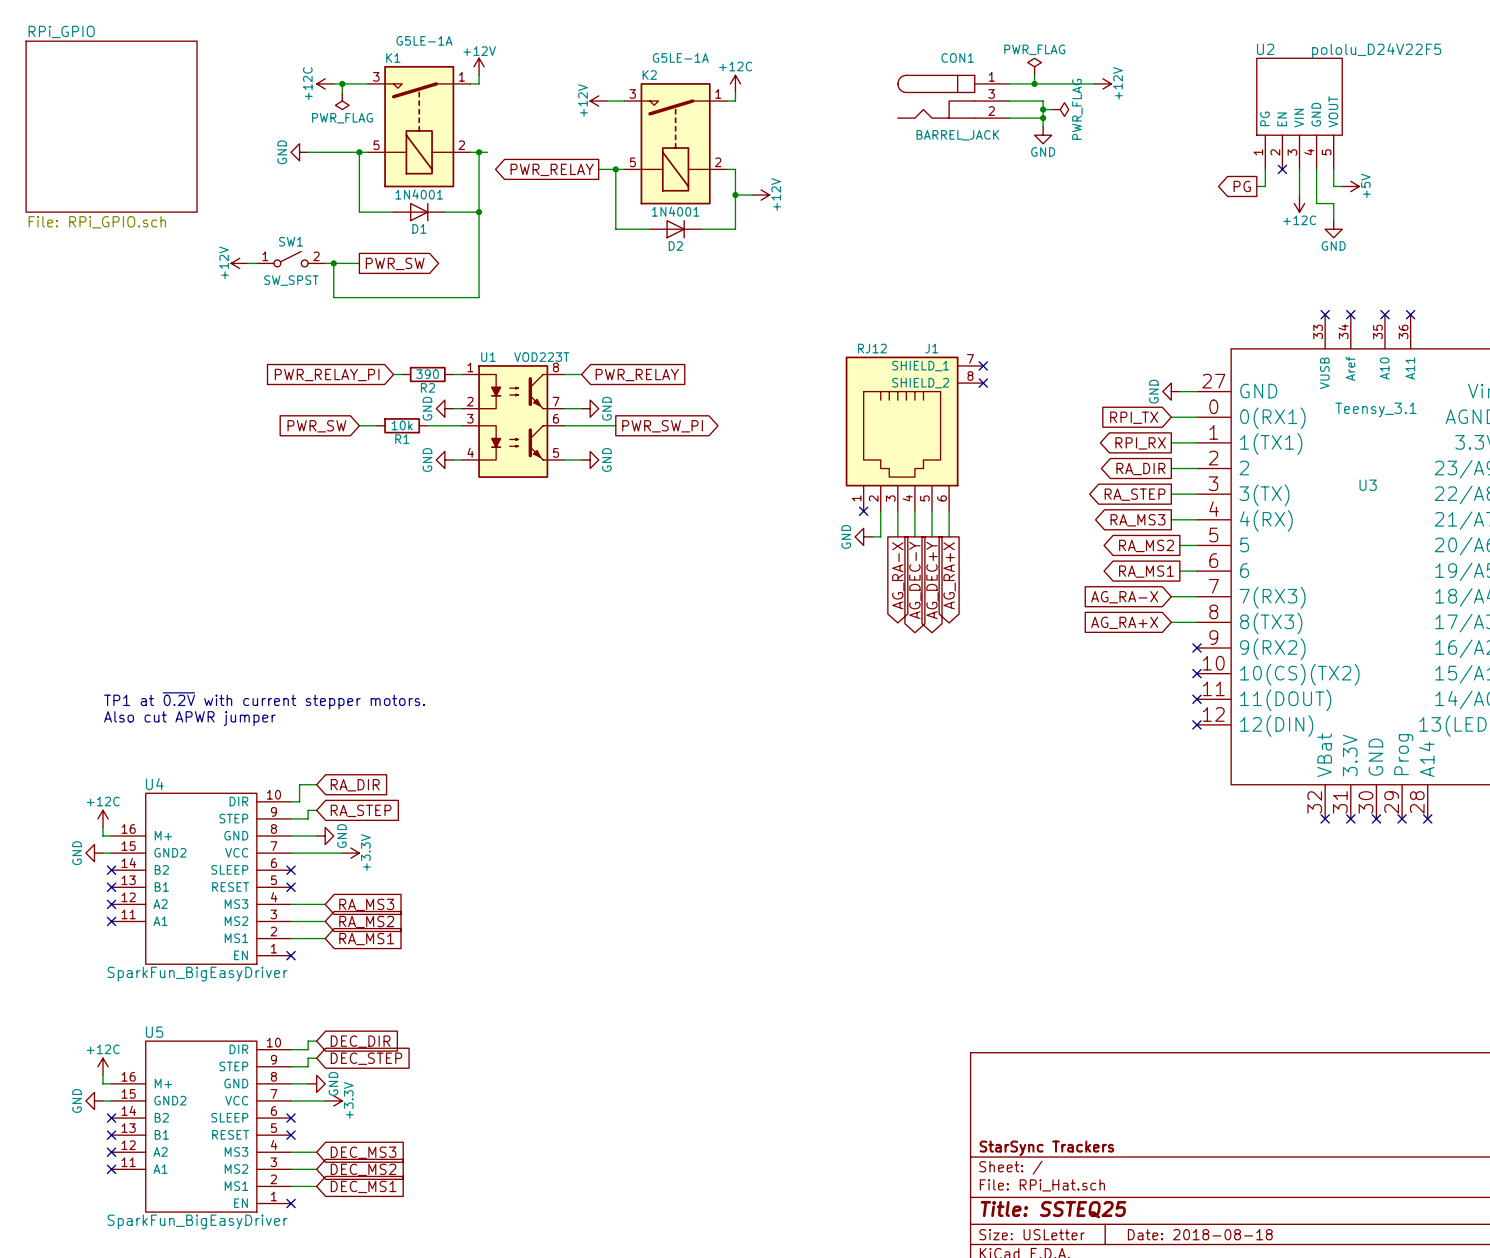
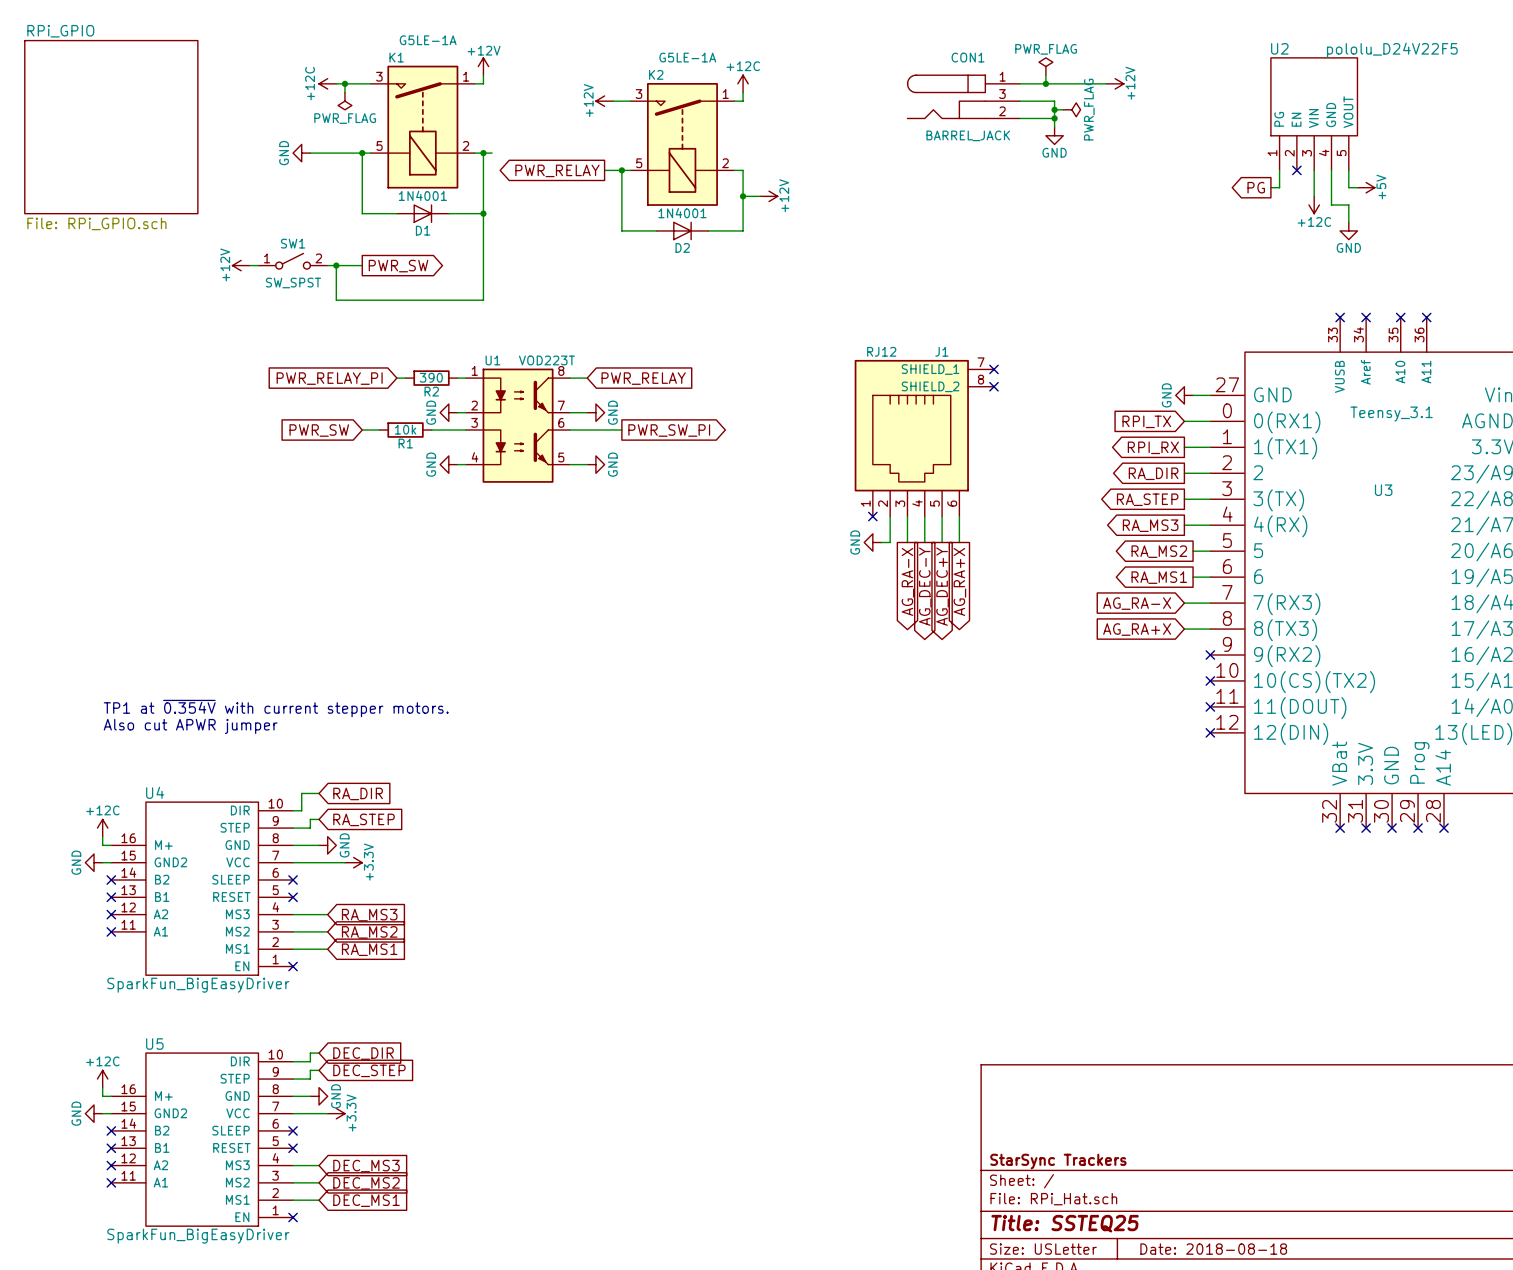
text: TP1 at ~{0.2V} with current stepper motors. (264, 700) -> TP1 at ~{0.354V} with current stepper motors. (276, 708)

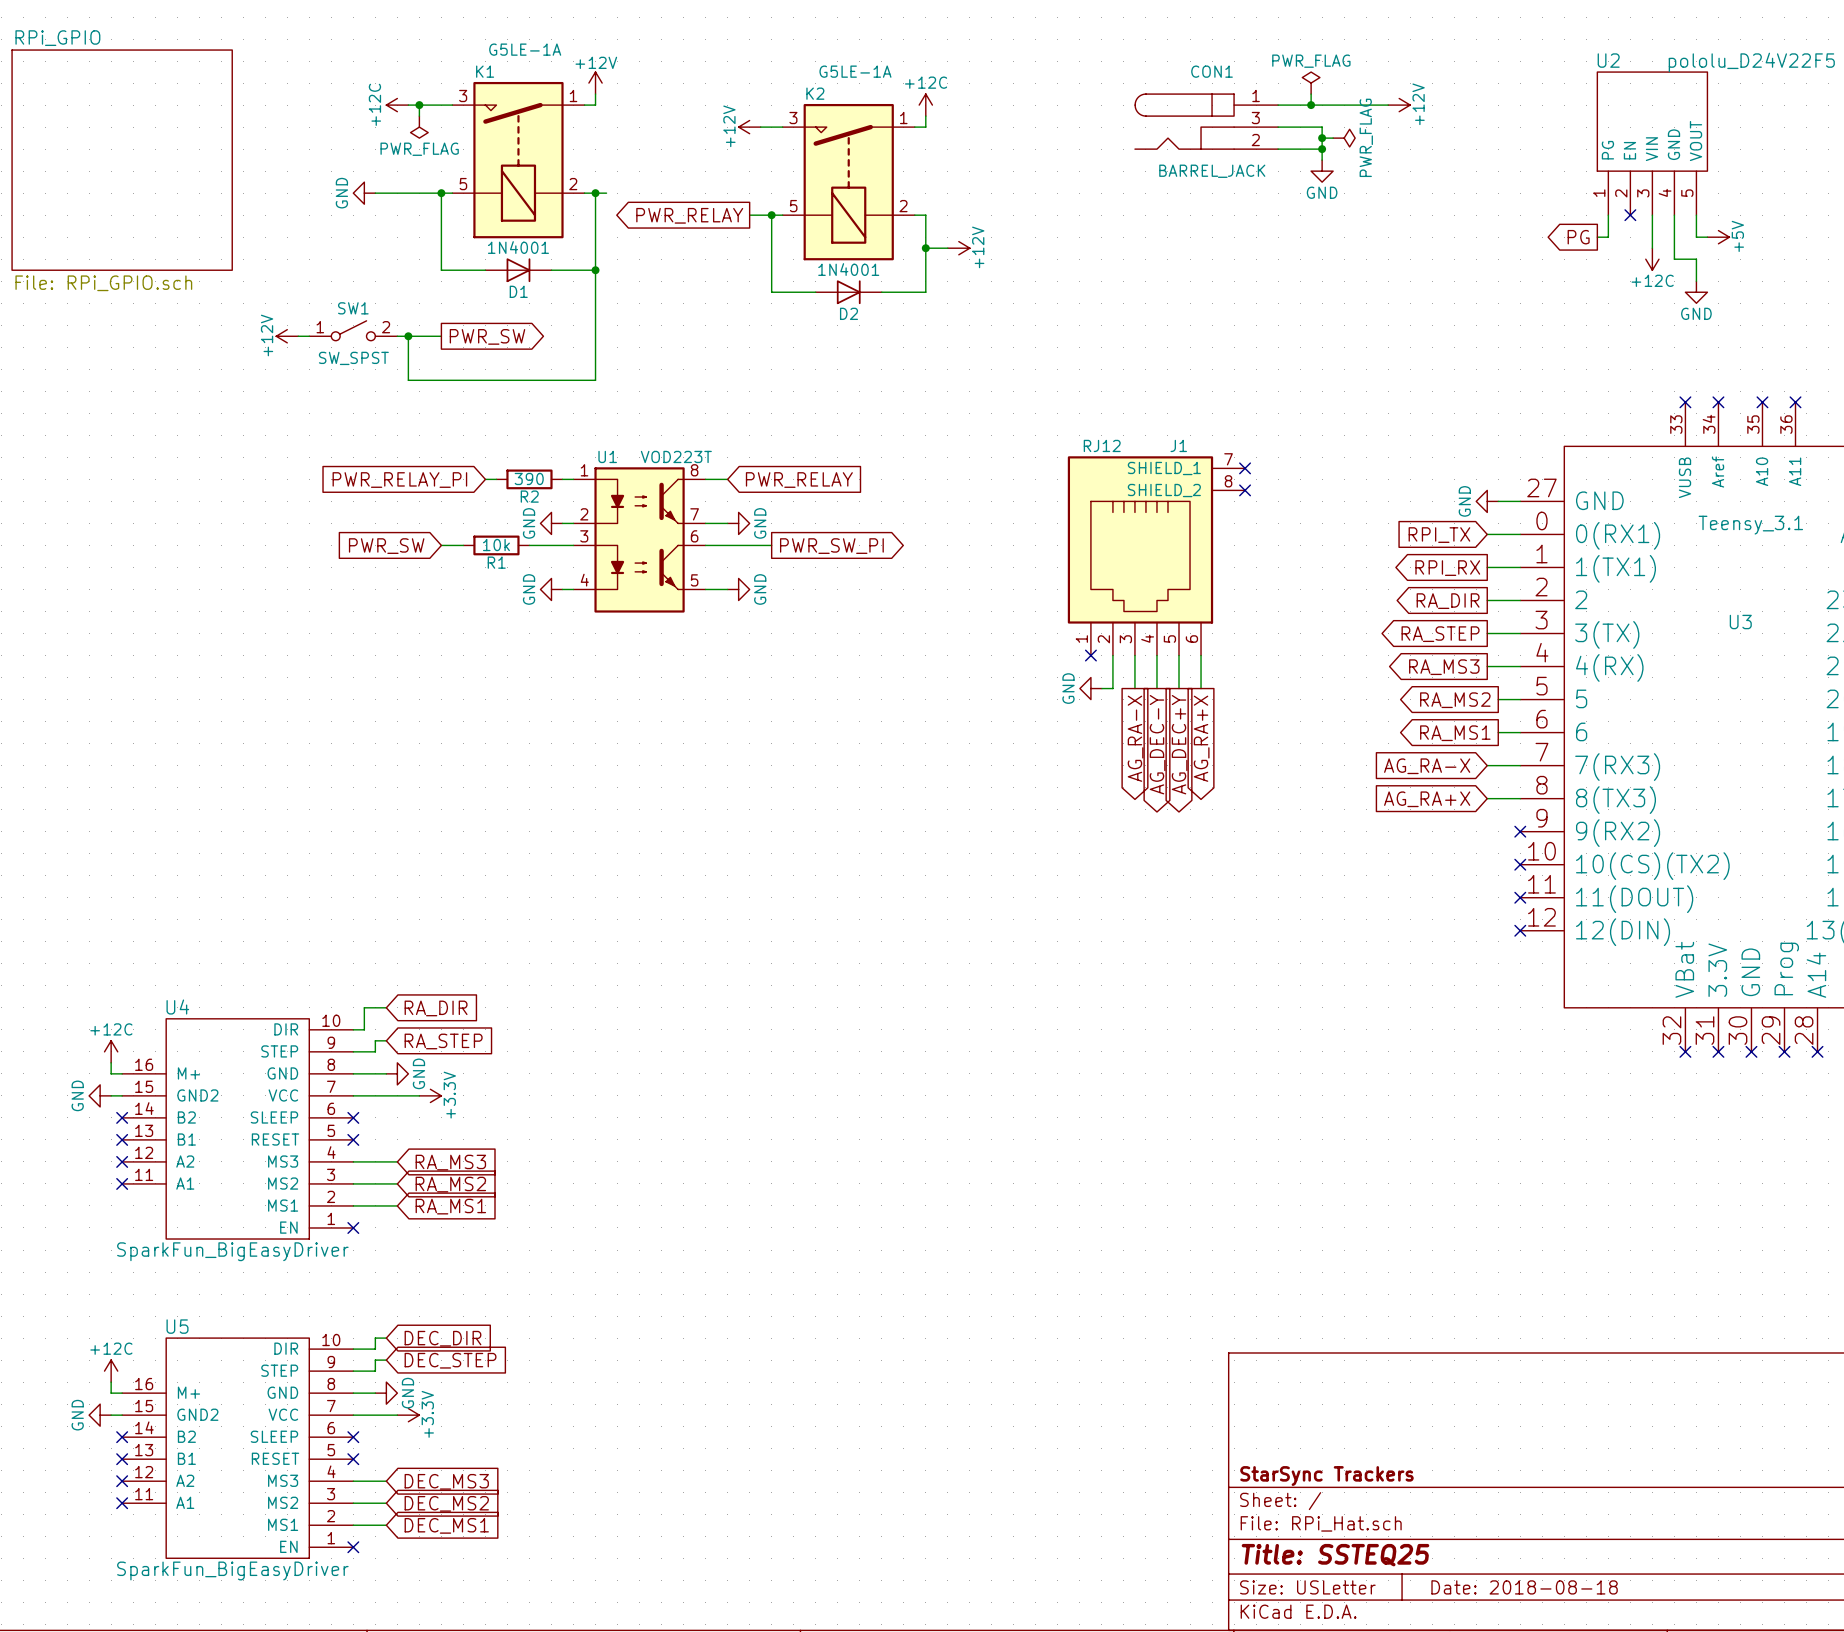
text: TP1 at ~{0.354V} with current stepper motors. (276, 708) -> none
text: Also cut APWR jumper (190, 726) -> none

